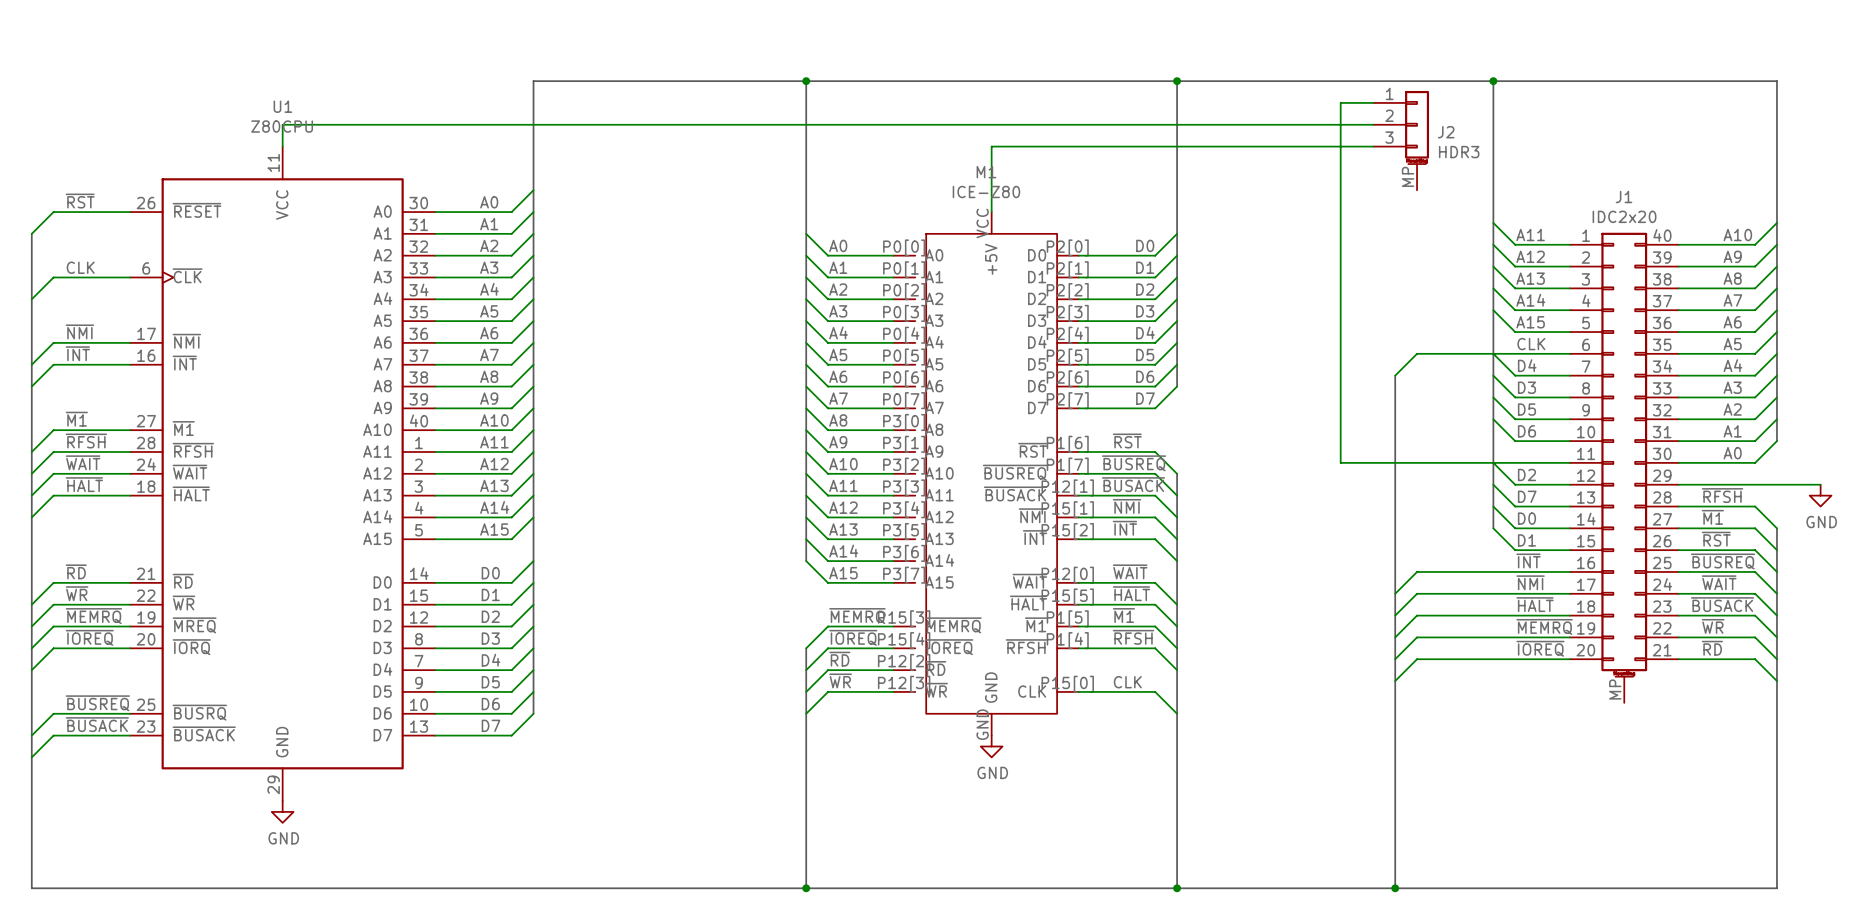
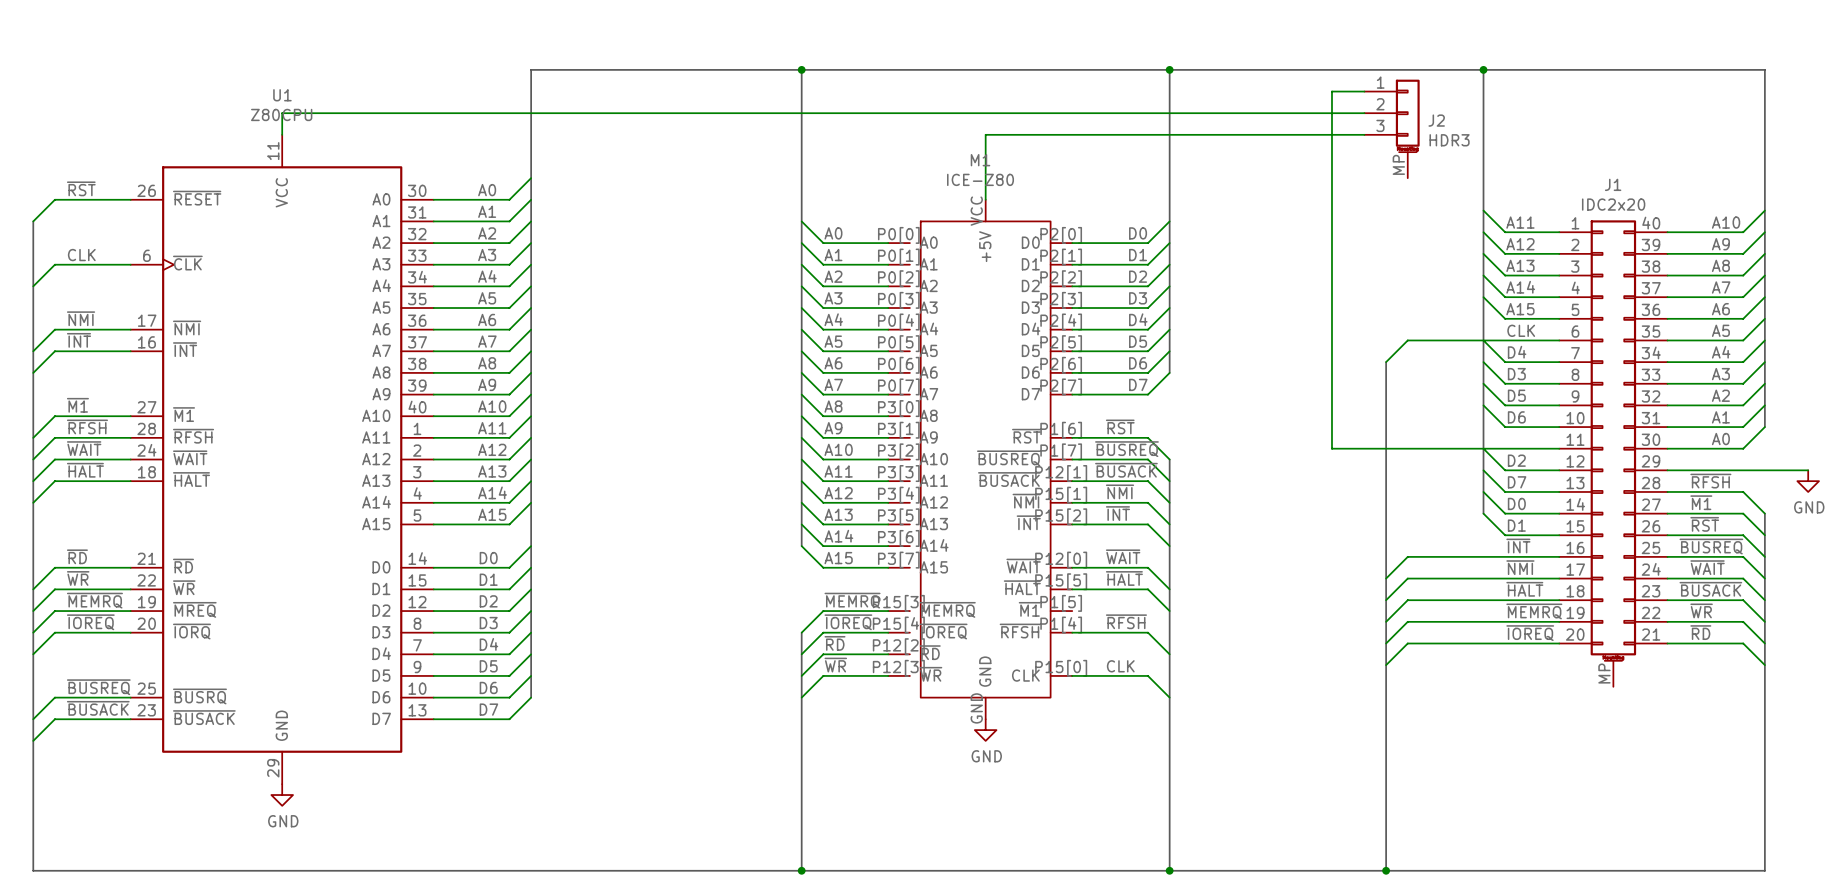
label: ~{M1} (1123, 615) -> none
wire: (1078, 626) (1155, 626) (1177, 648) -> none

